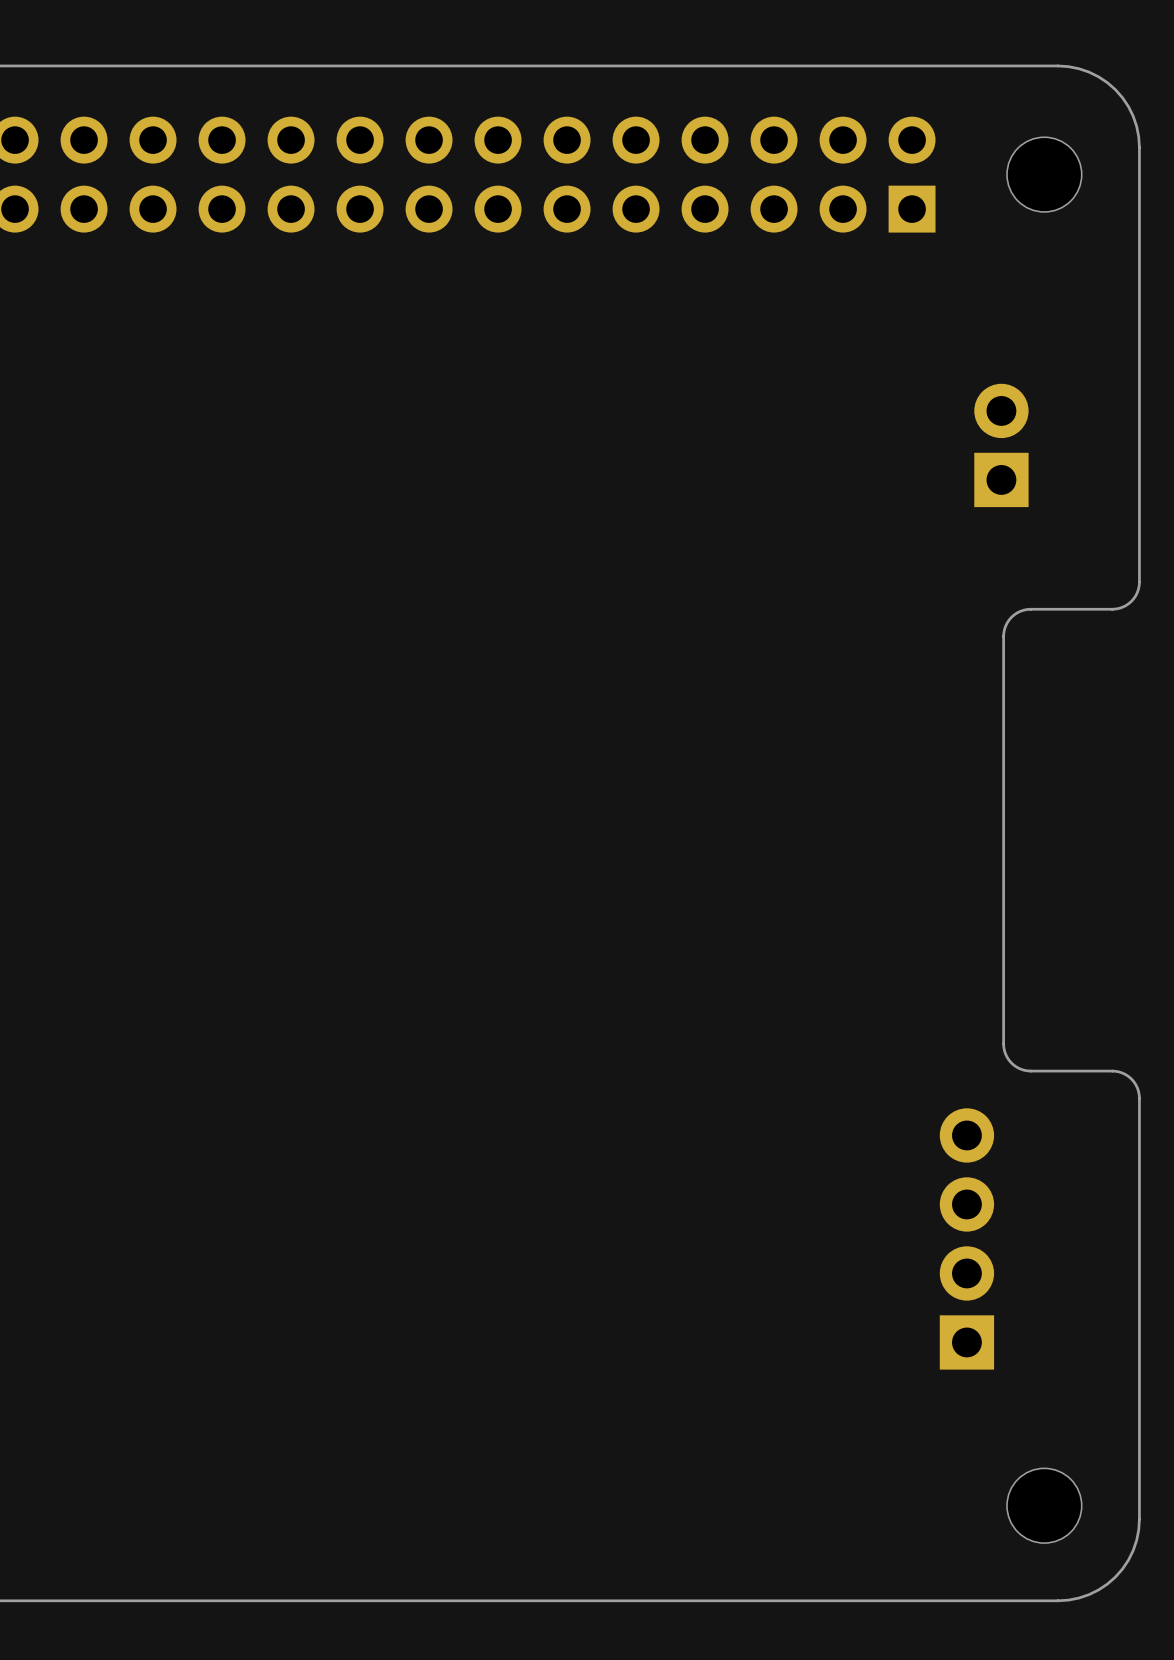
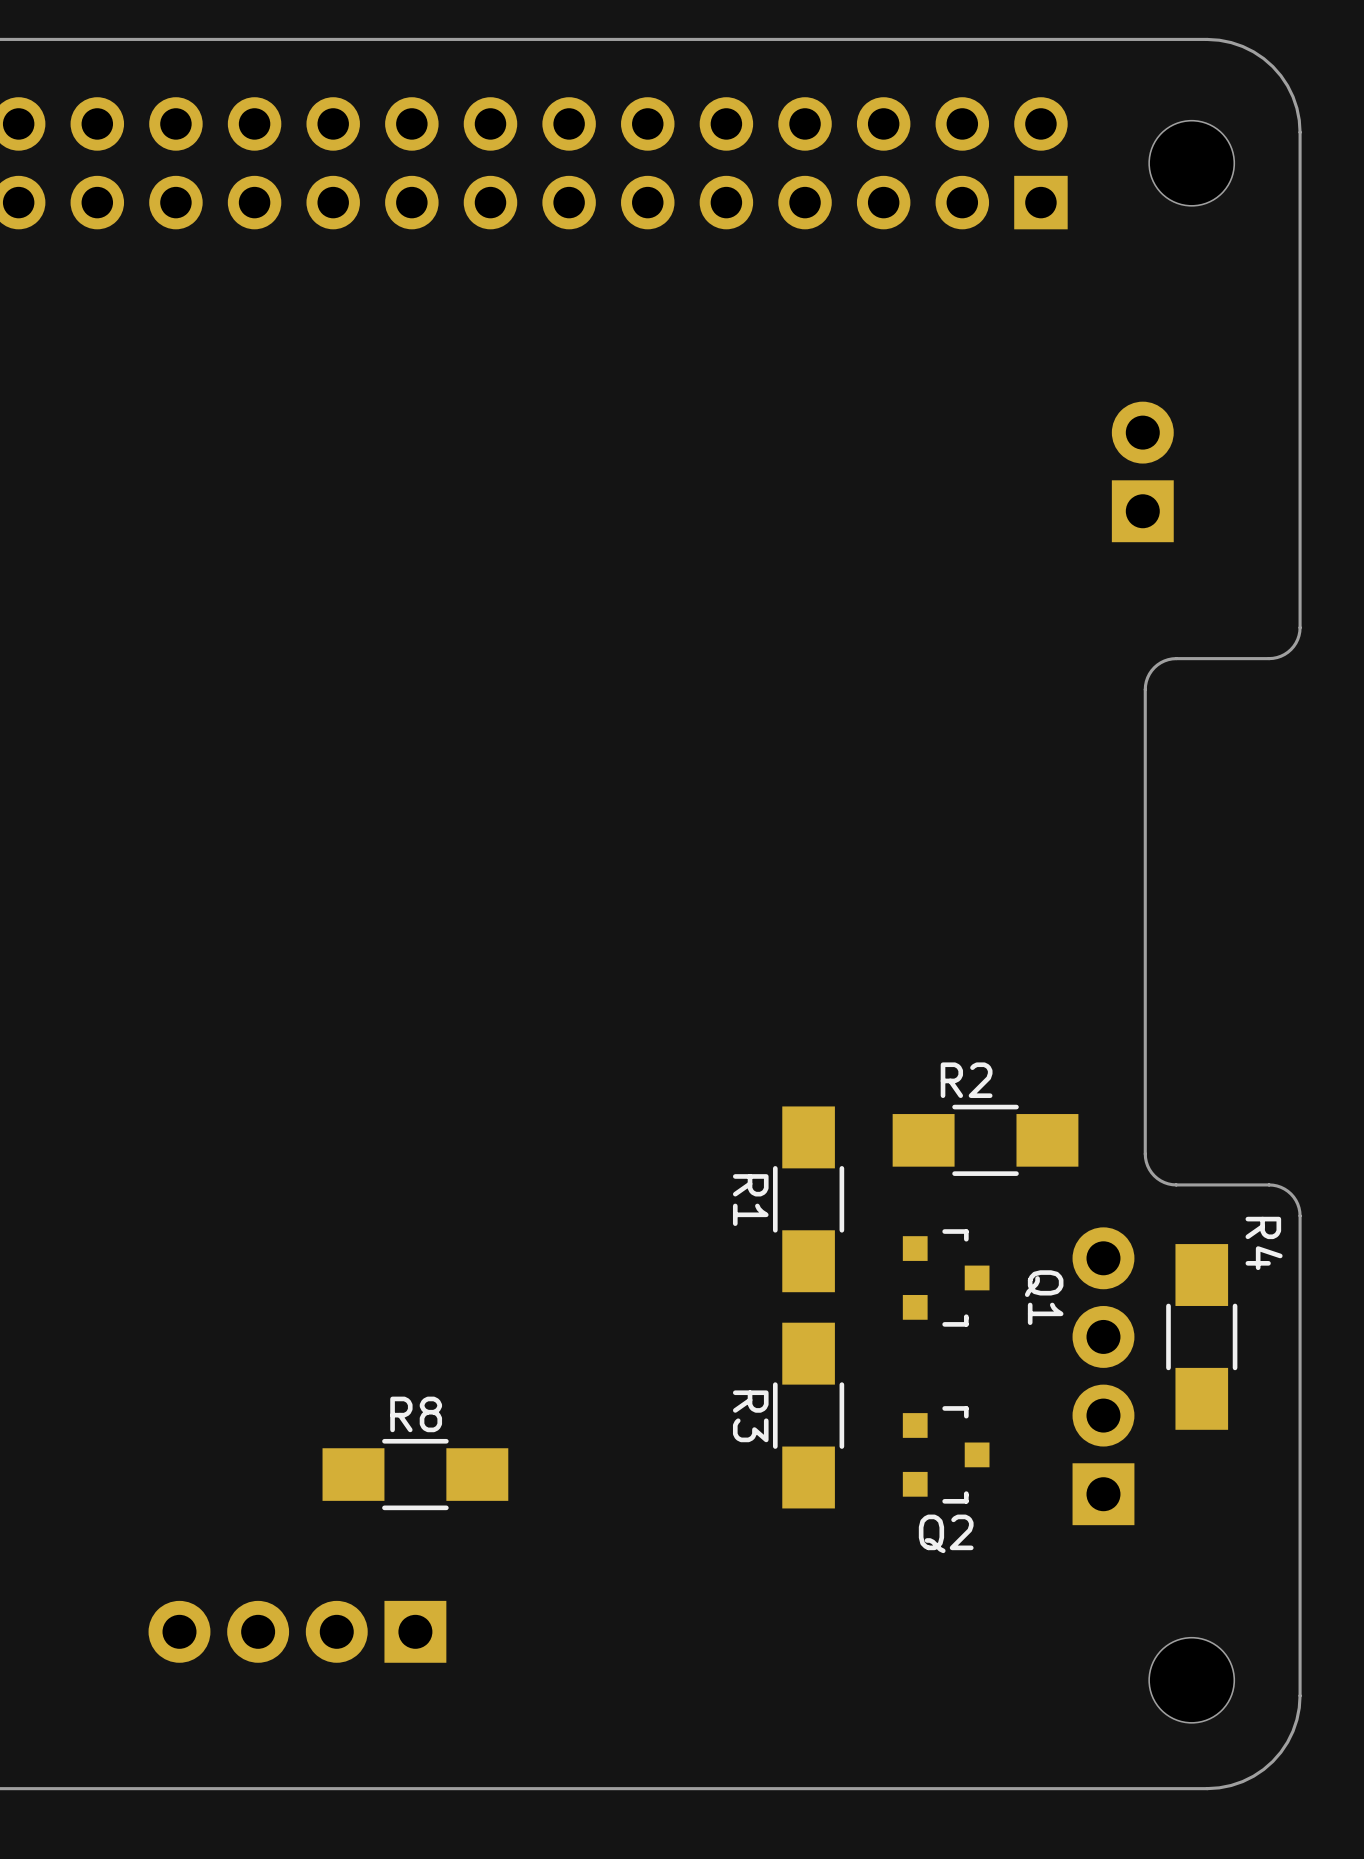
R2: none -> (985, 1140)
R1: none -> (808, 1199)
Q1: none -> (946, 1277)
R4: none -> (1201, 1336)
R3: none -> (808, 1415)
Q2: none -> (946, 1454)
R8: none -> (415, 1474)
part: none -> (297, 1631)

